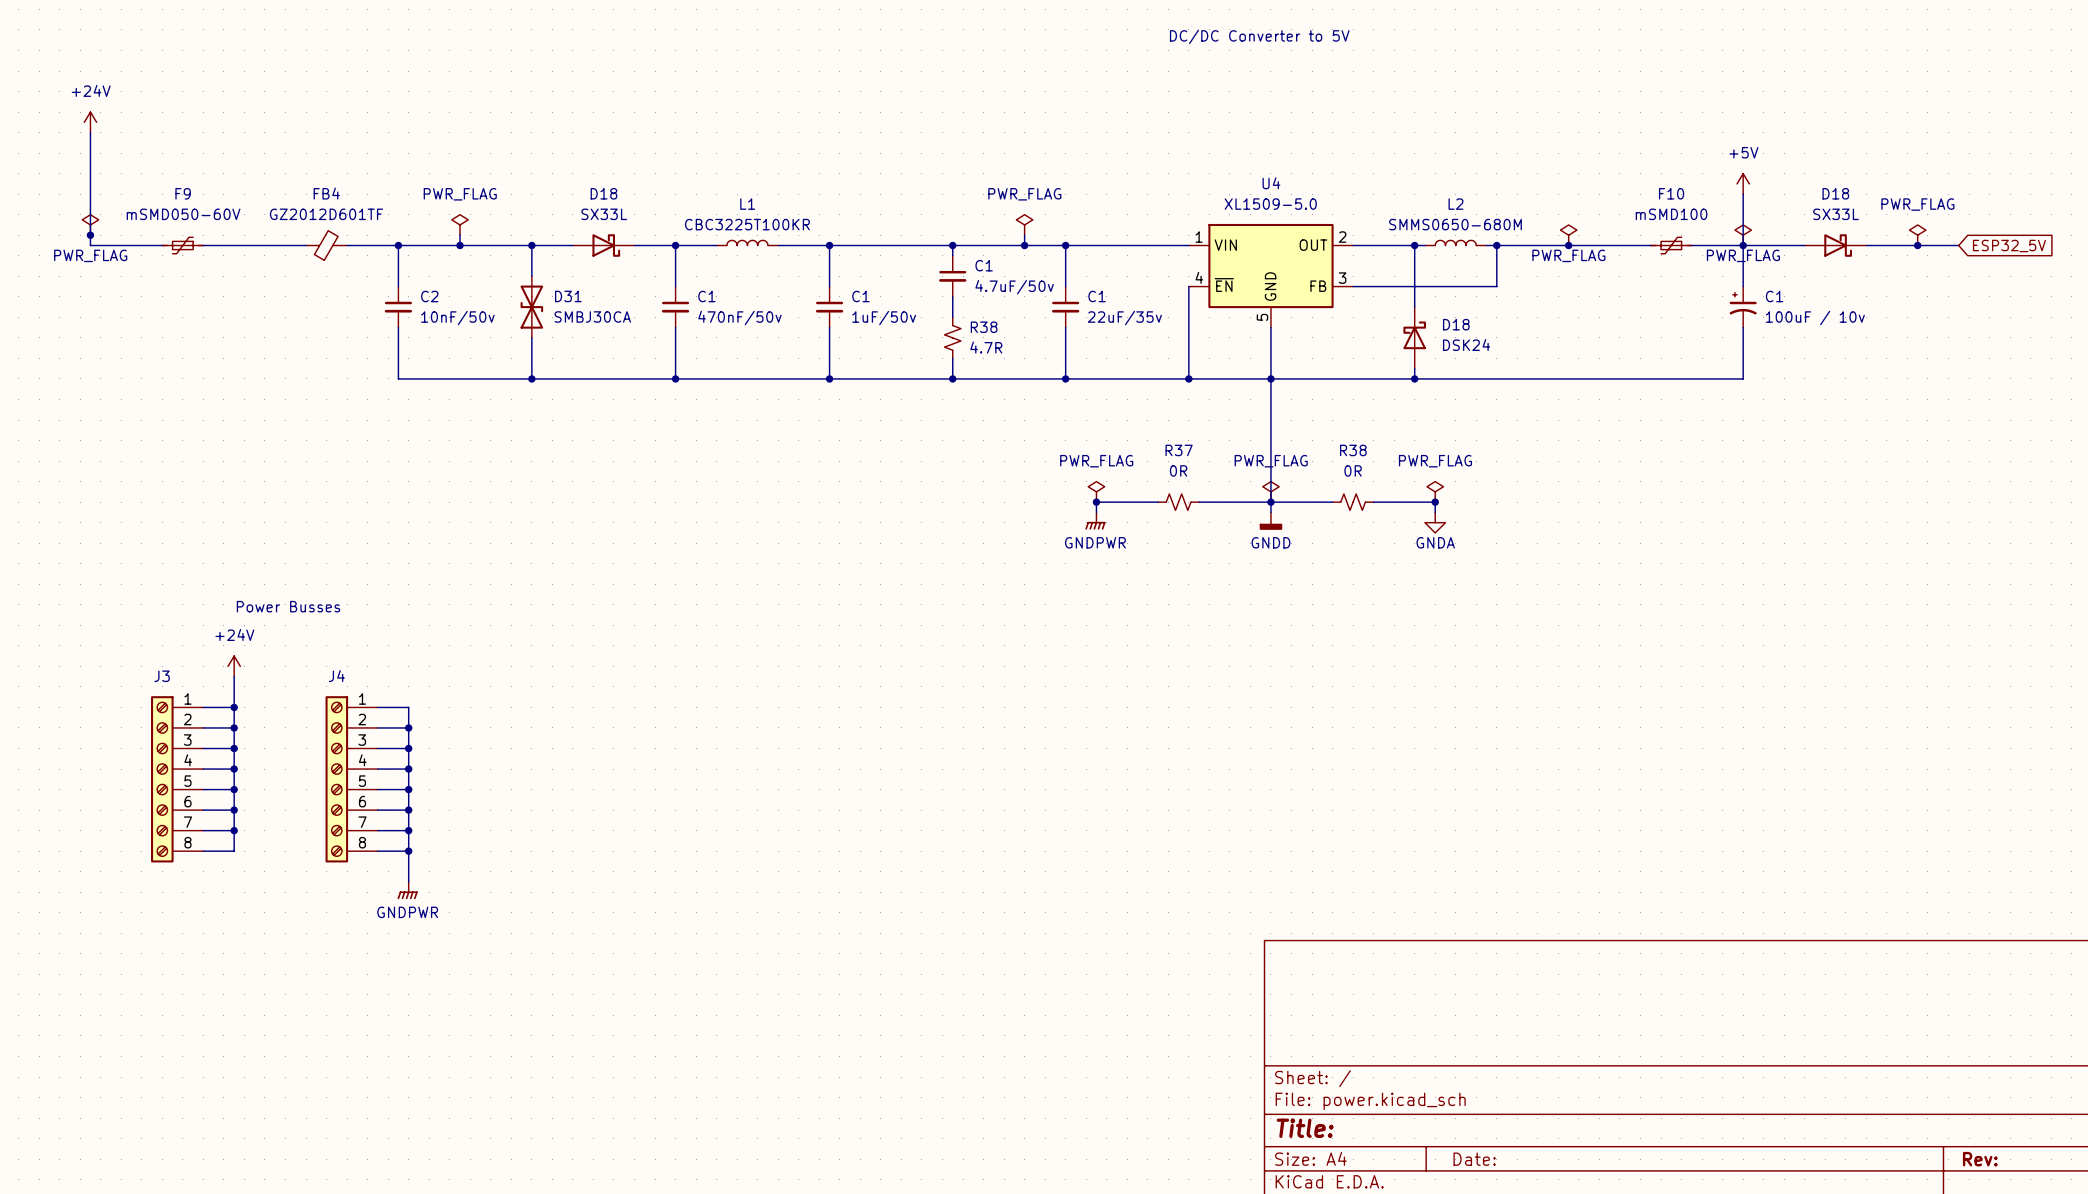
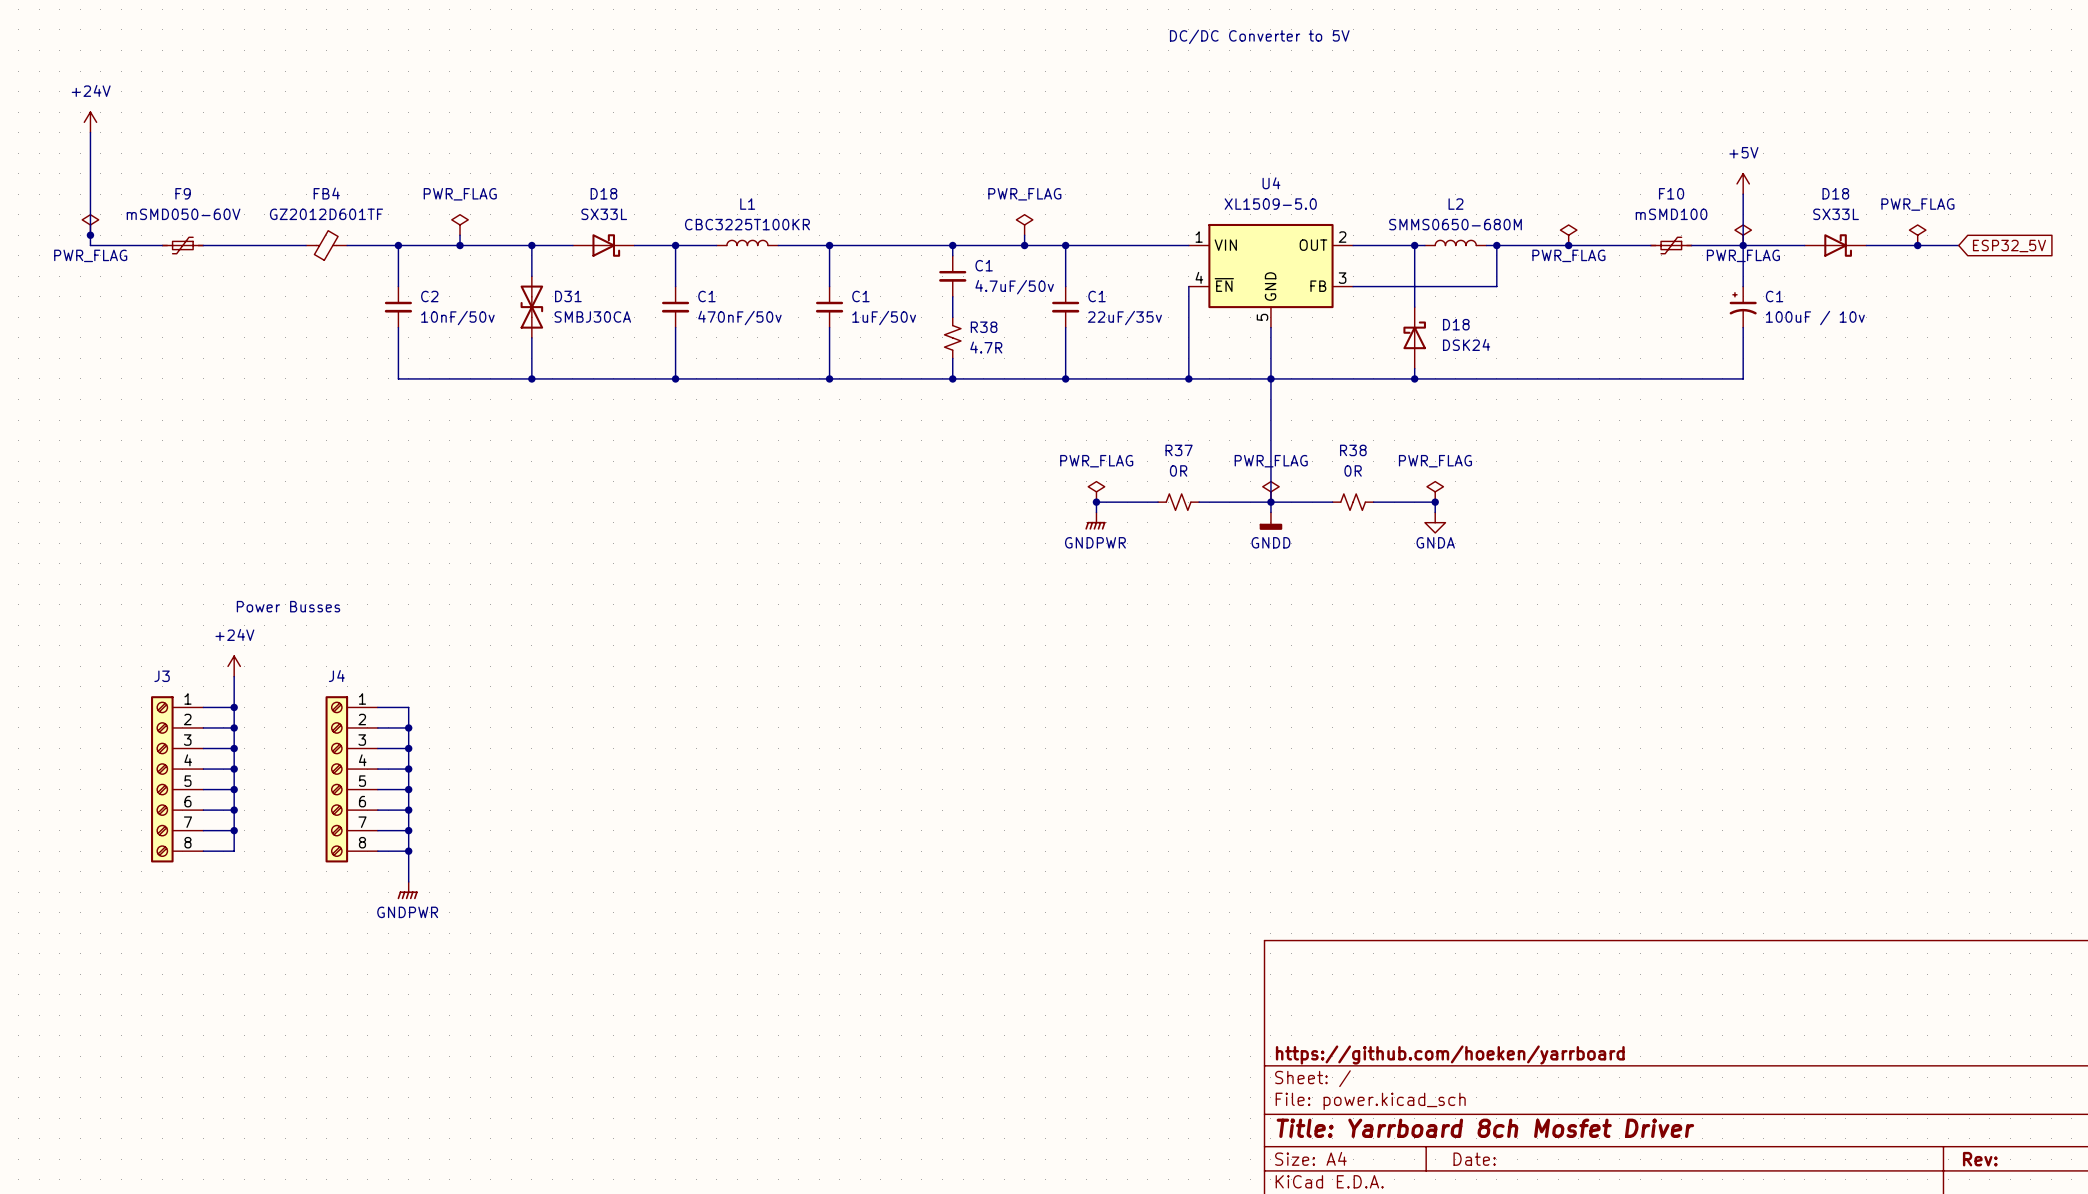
title block: none -> https://github.com/hoeken/yarrboard (1450, 1055)
title block: Title: (1305, 1128) -> Title: Yarrboard 8ch Mosfet Driver (1485, 1128)

